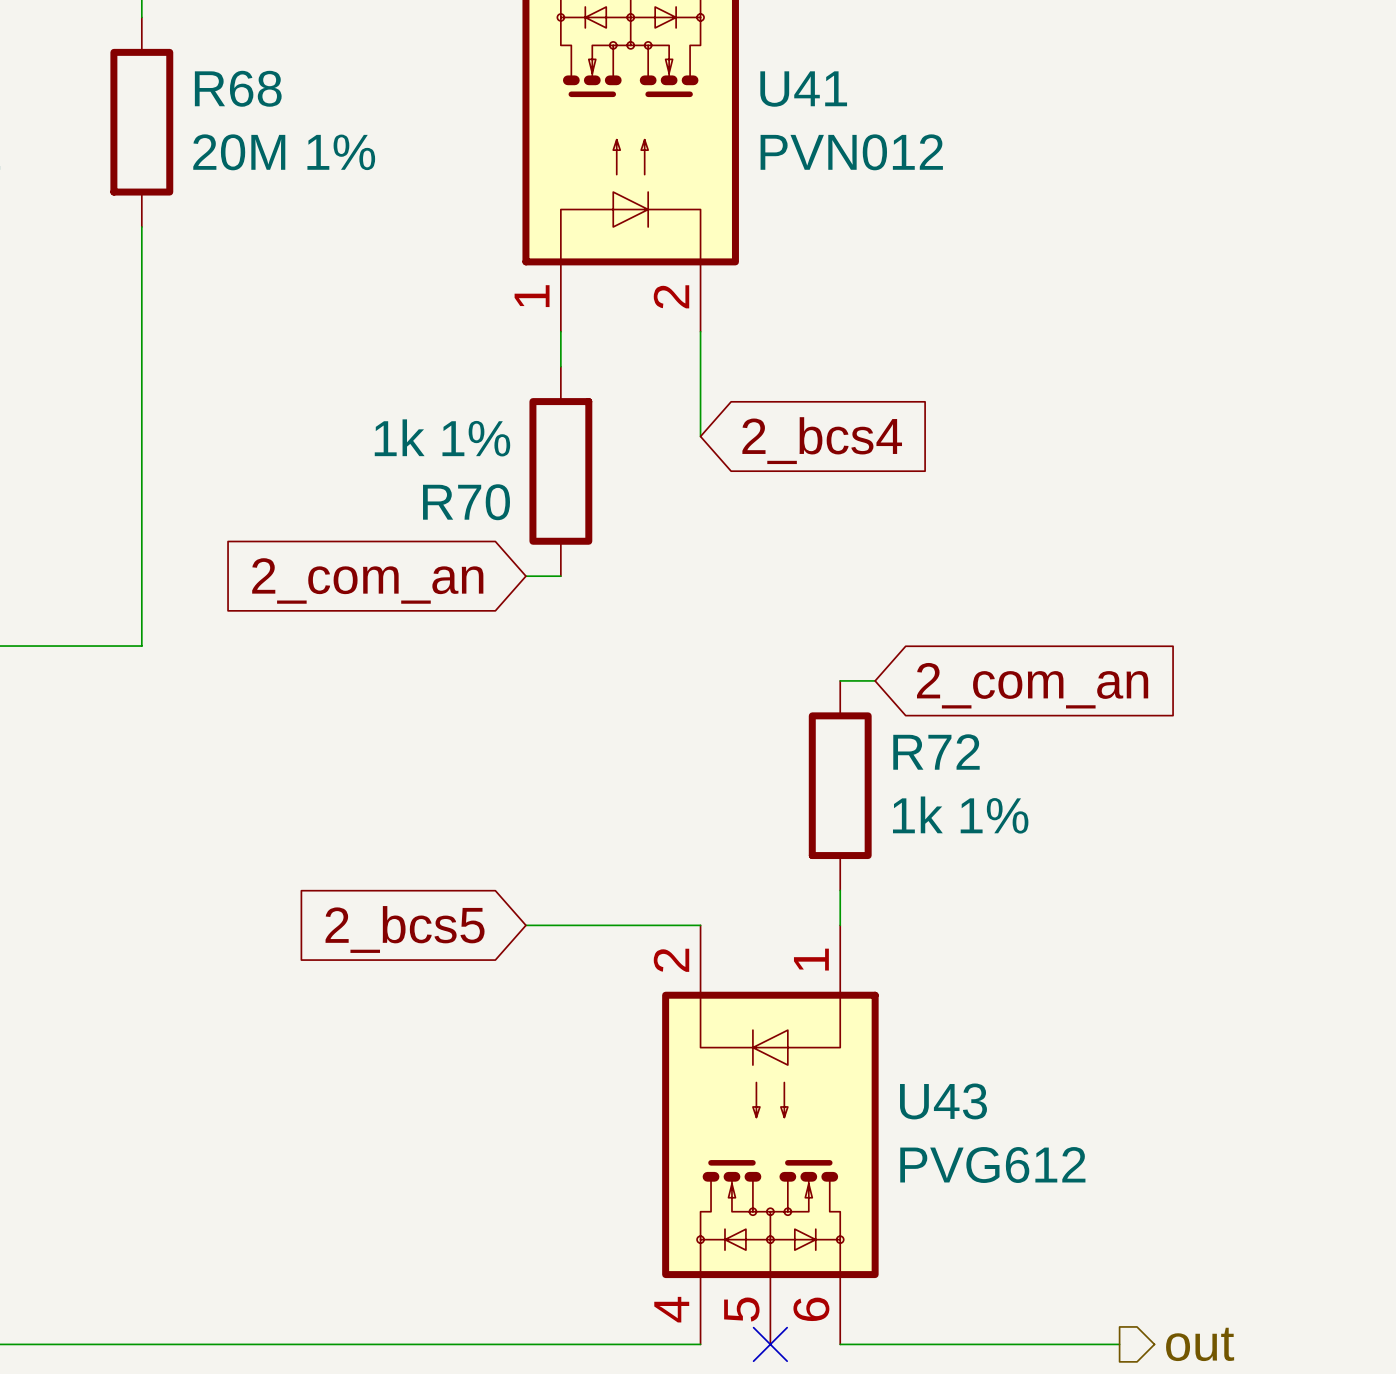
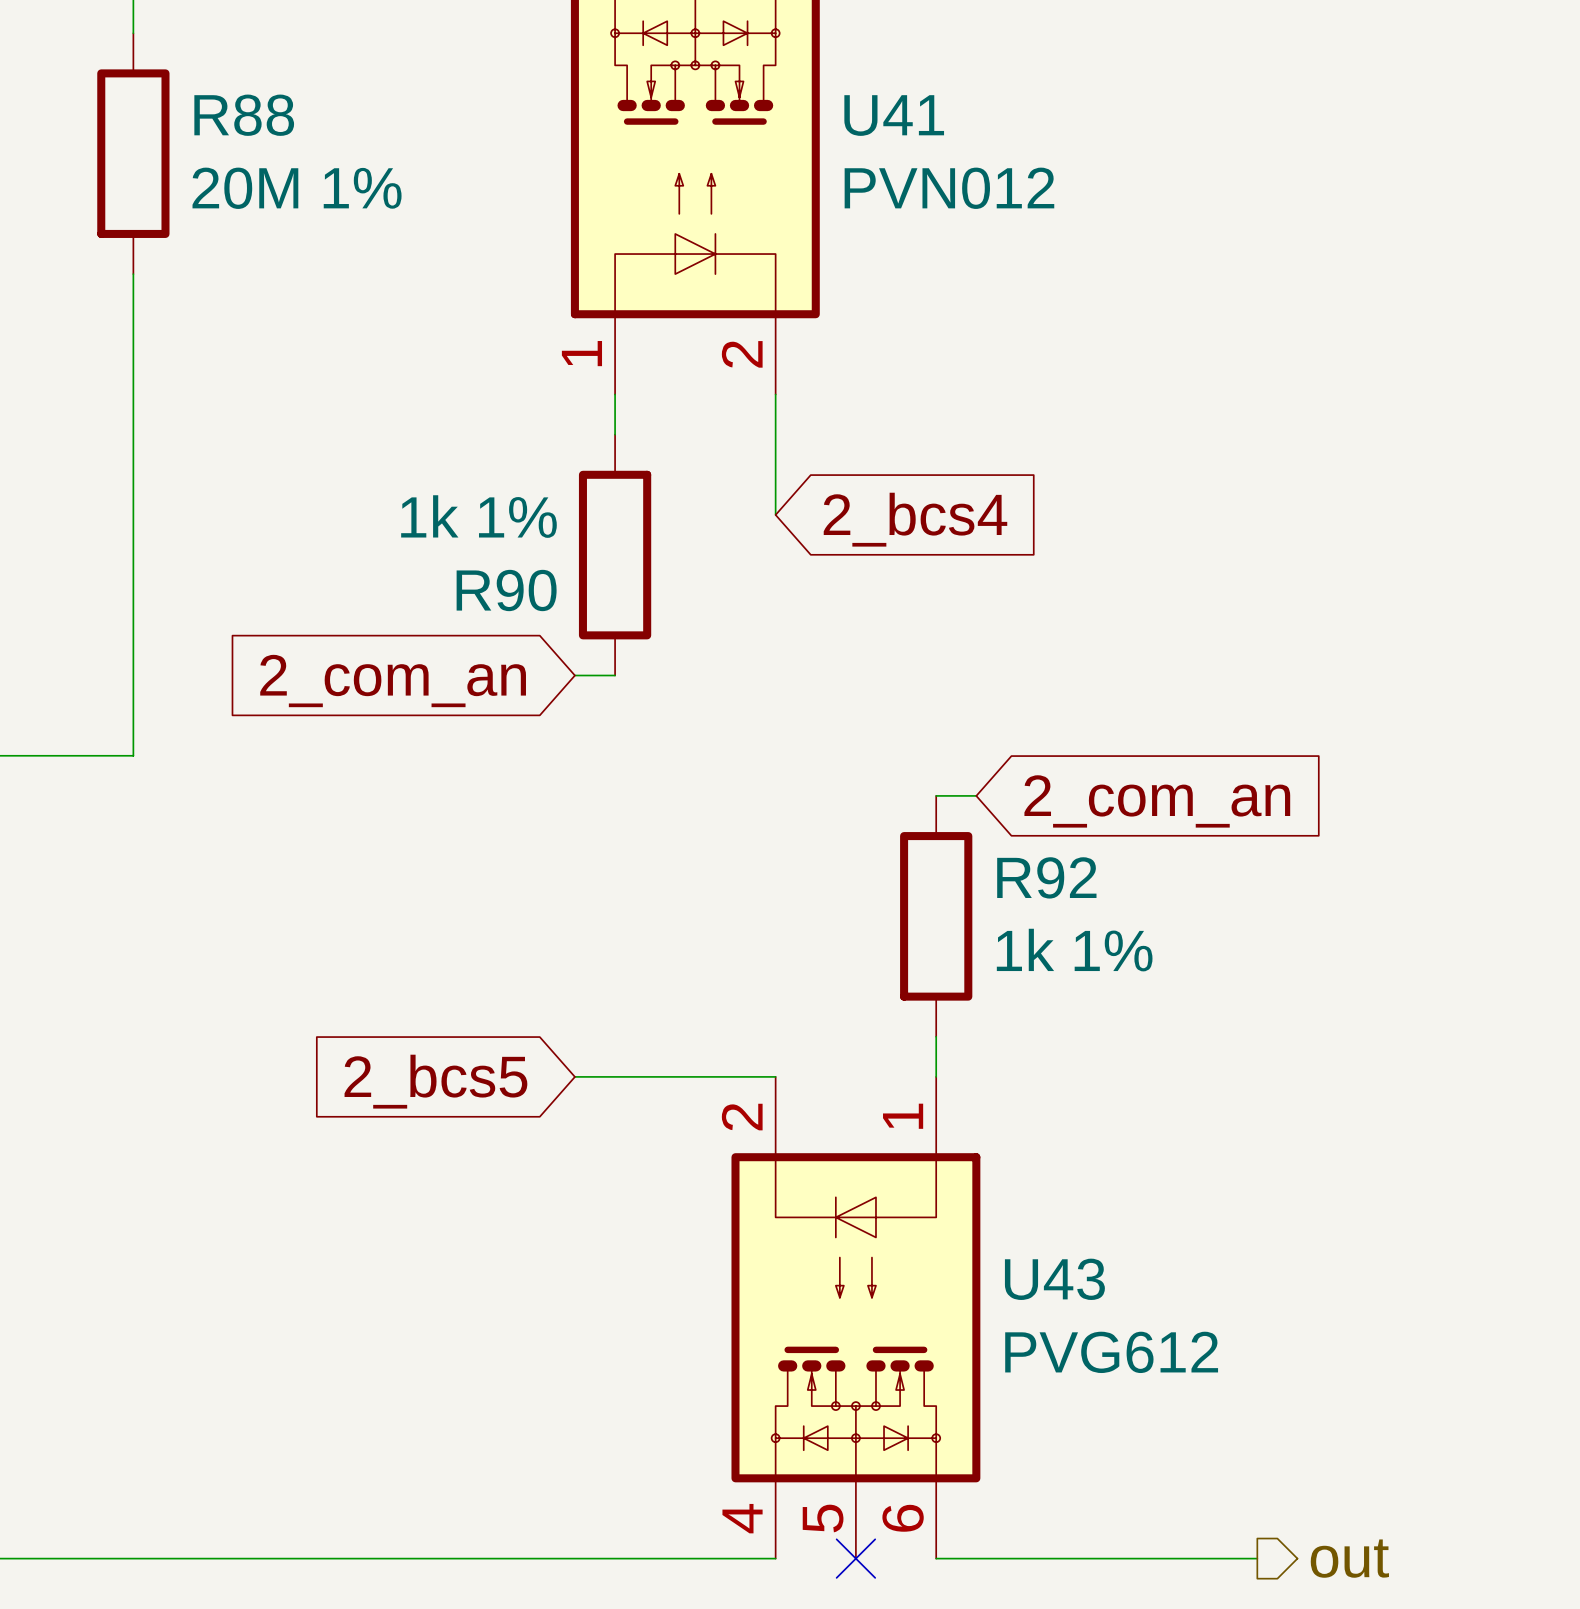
R68 name: R68 (238, 88) -> R88 (244, 115)
R70 name: R70 (466, 502) -> R90 (506, 590)
R72 name: R72 (936, 752) -> R92 (1046, 877)

